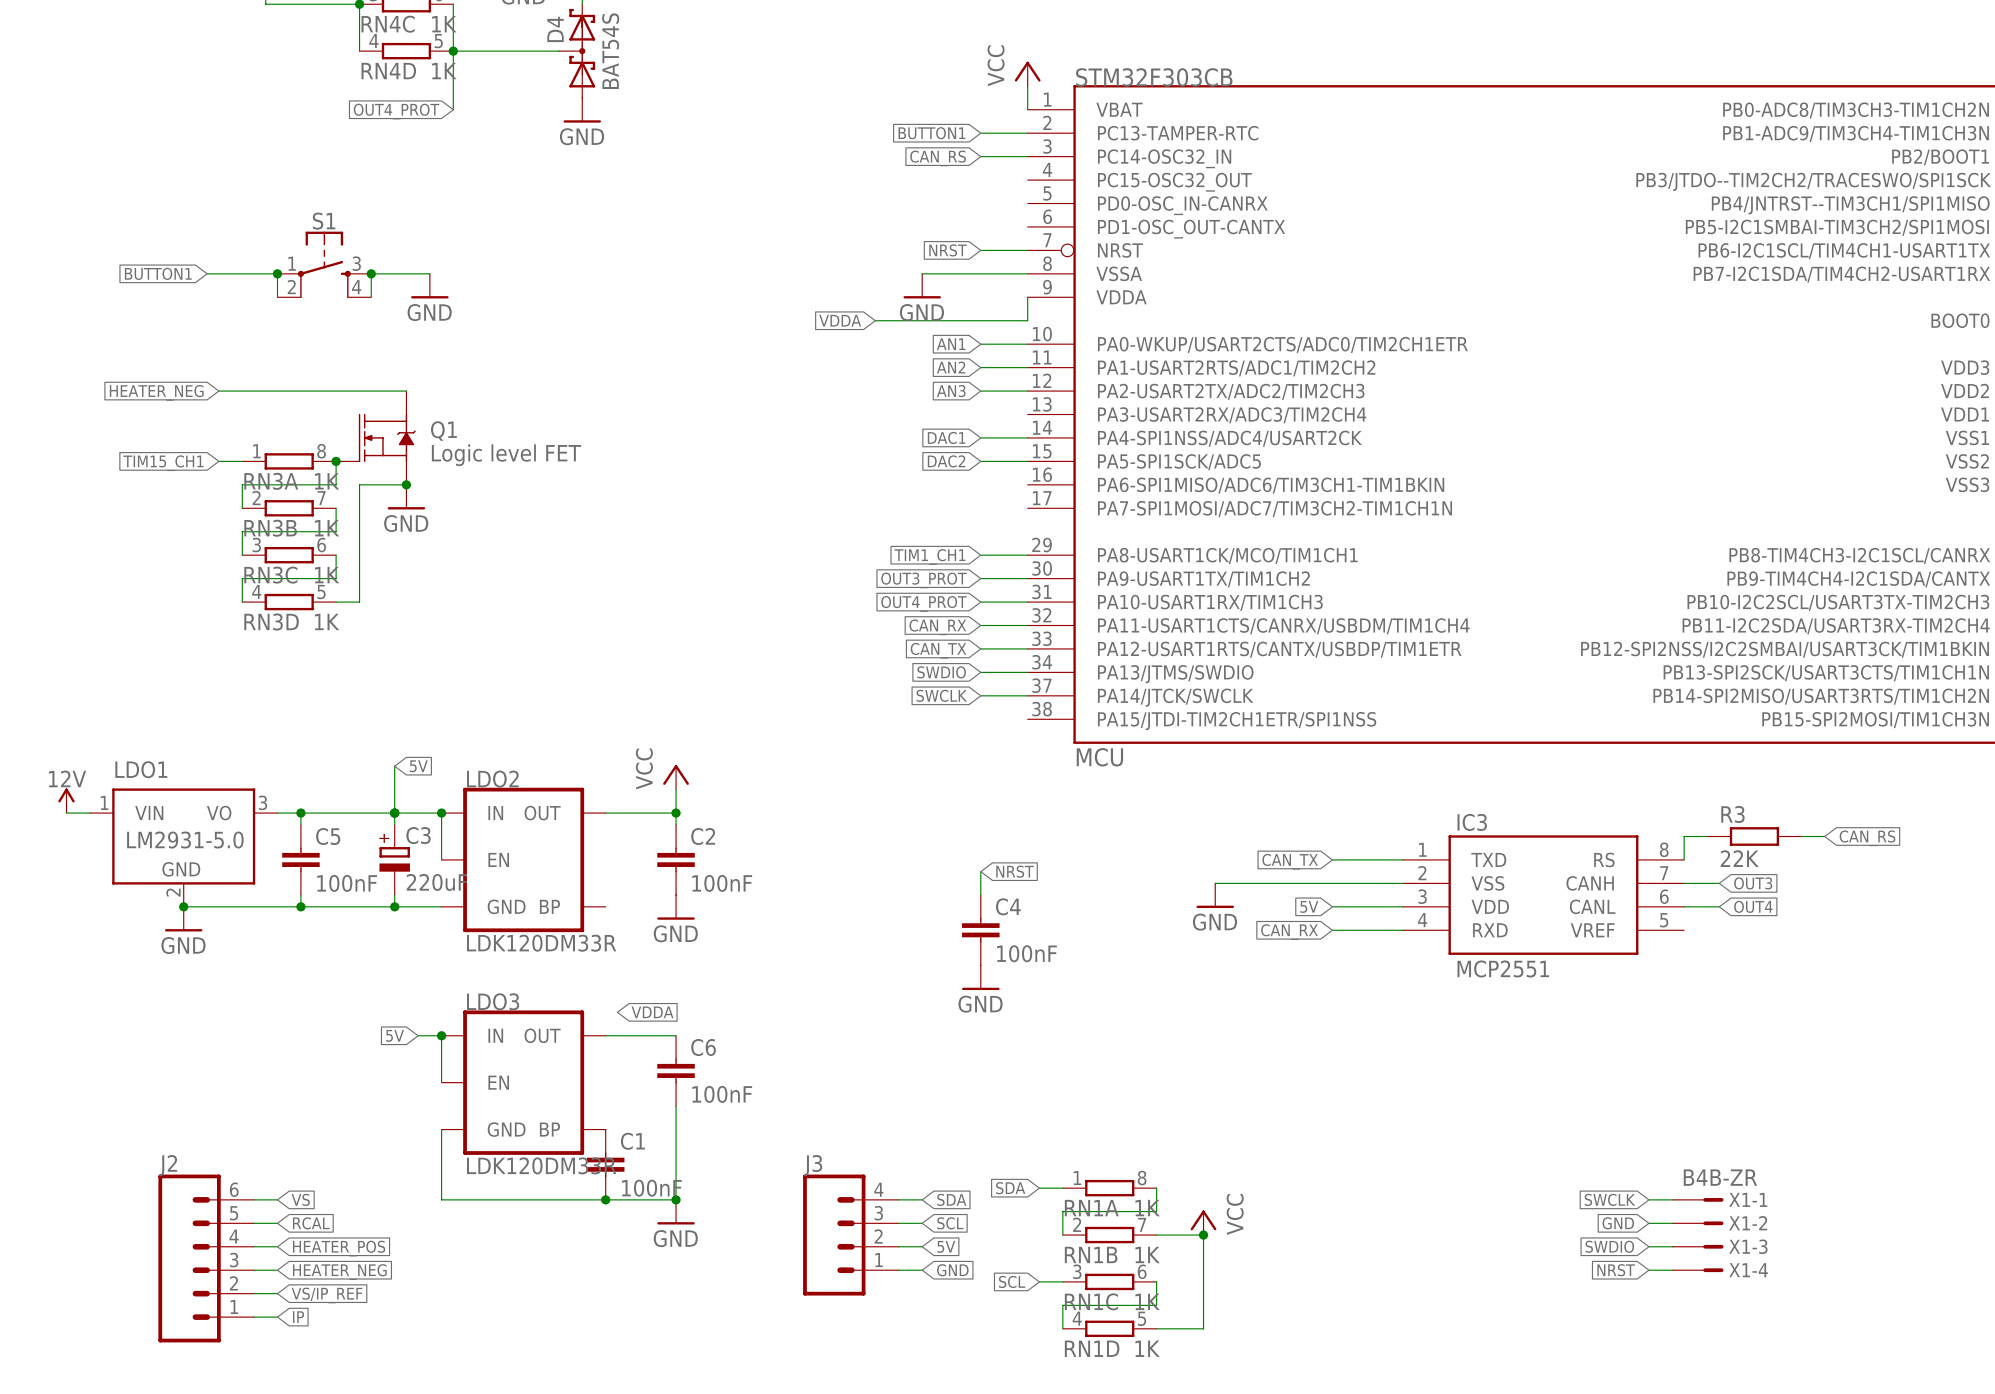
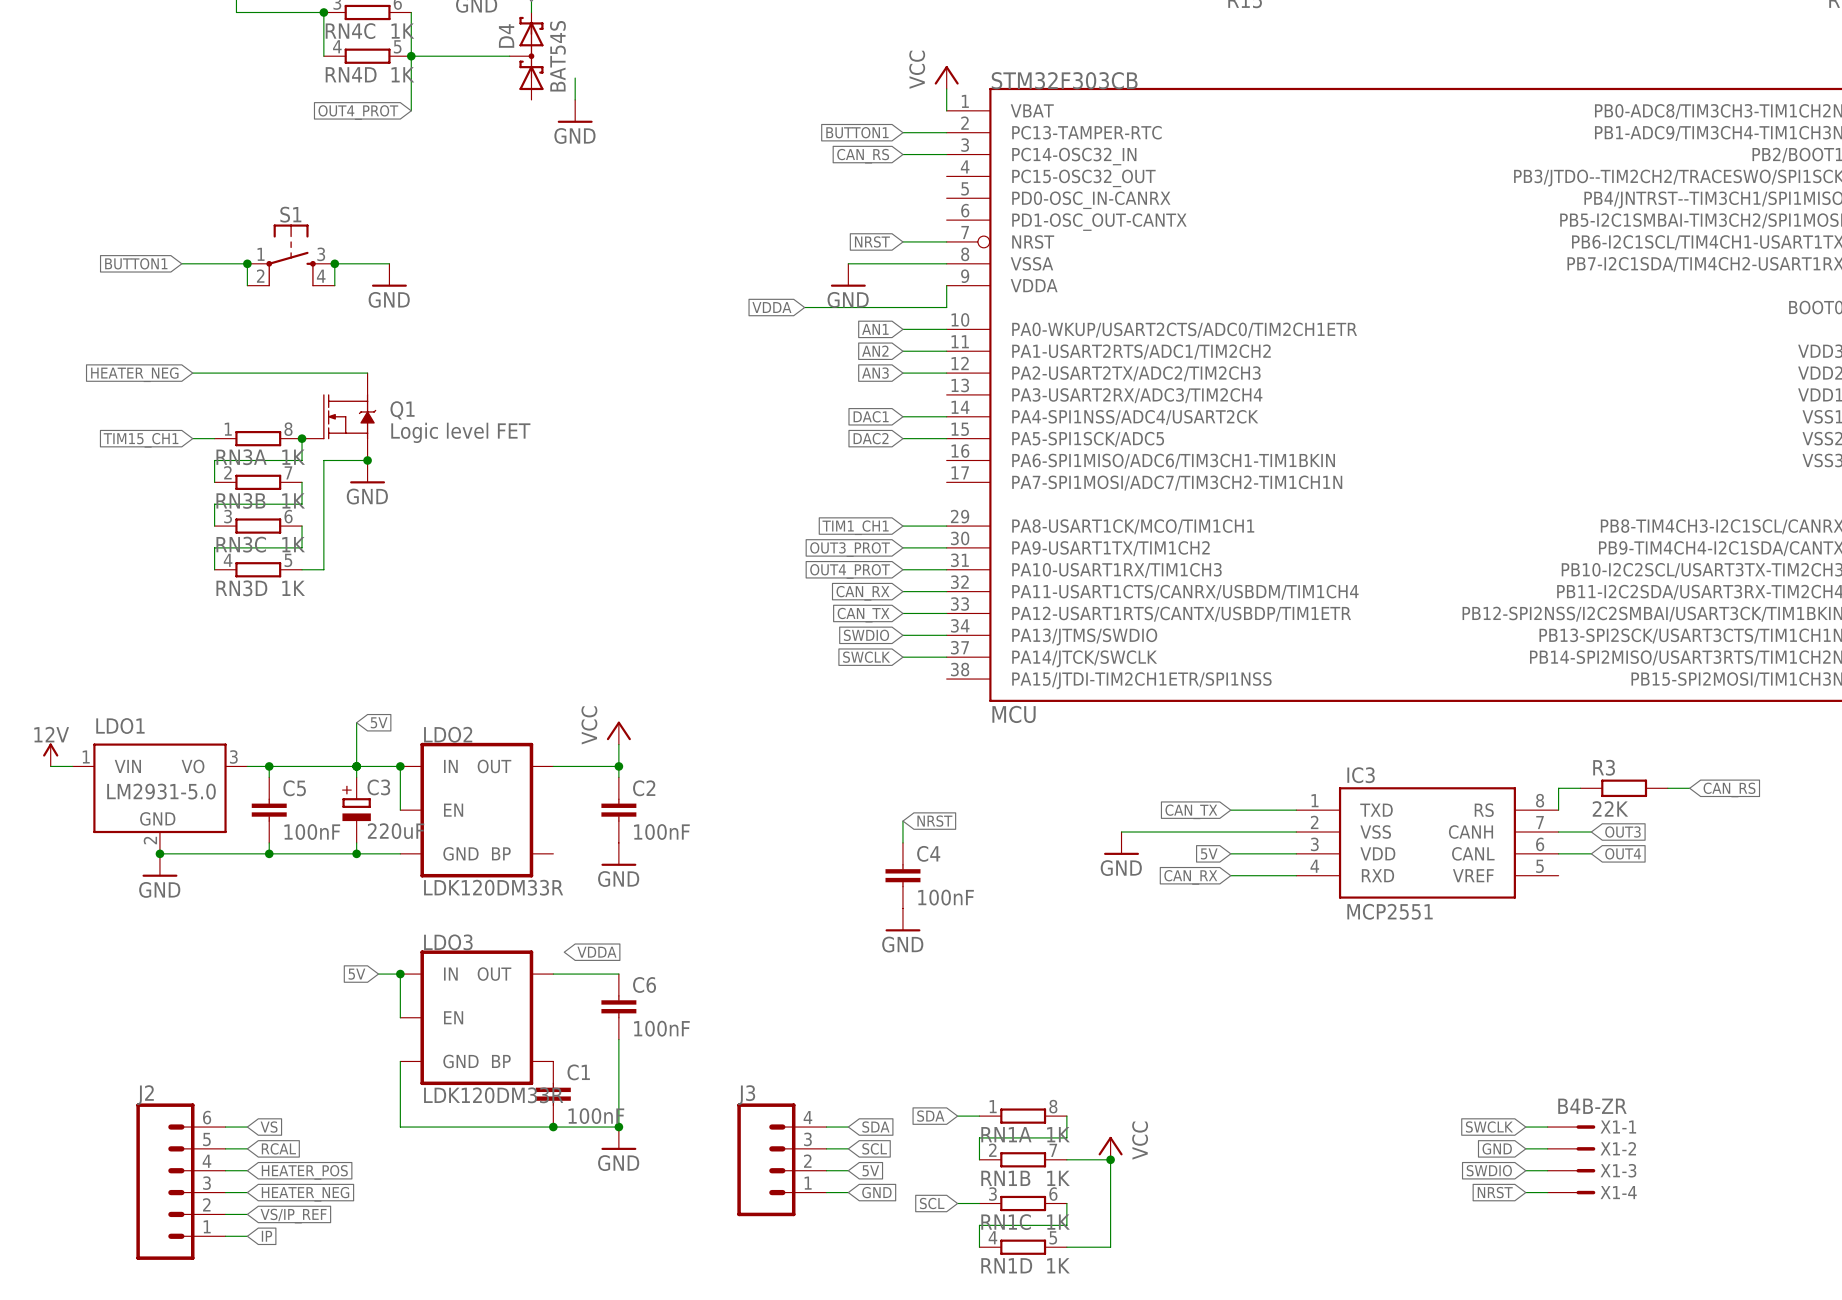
wire: none -> (575, 78) (575, 99)
power symbol position: GND (582, 110) -> GND (575, 111)

